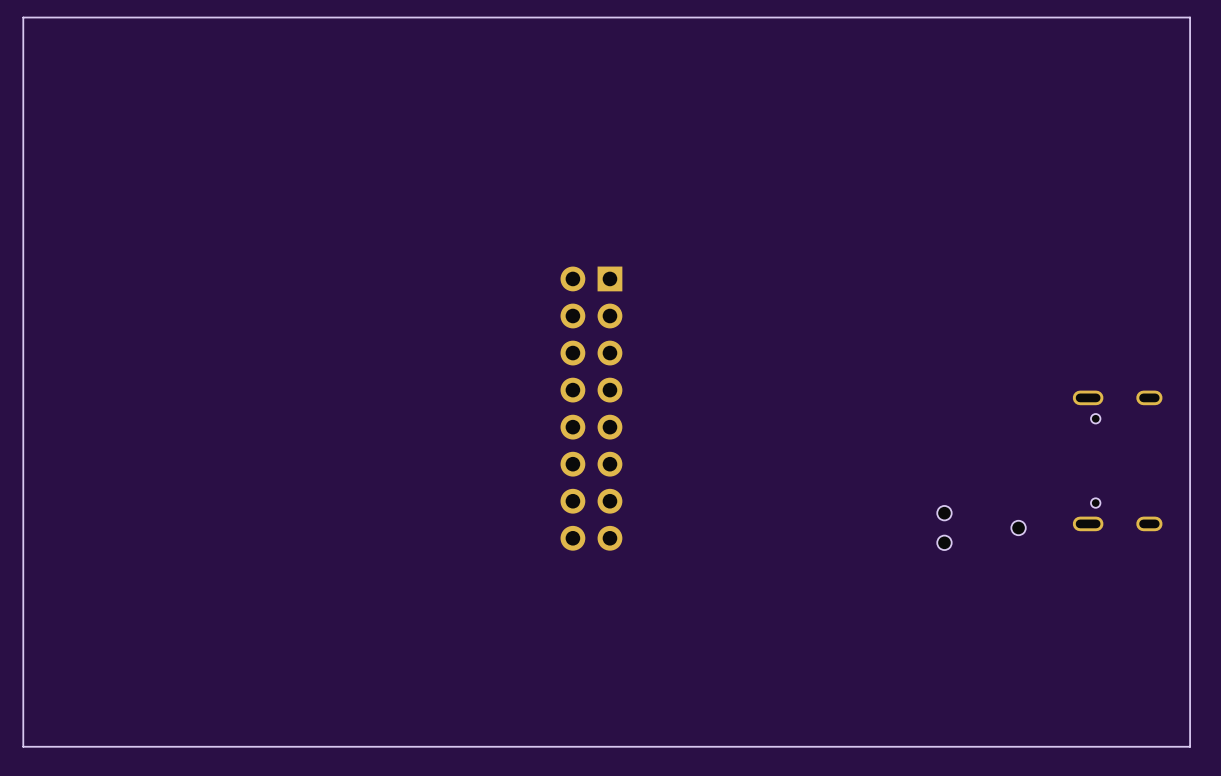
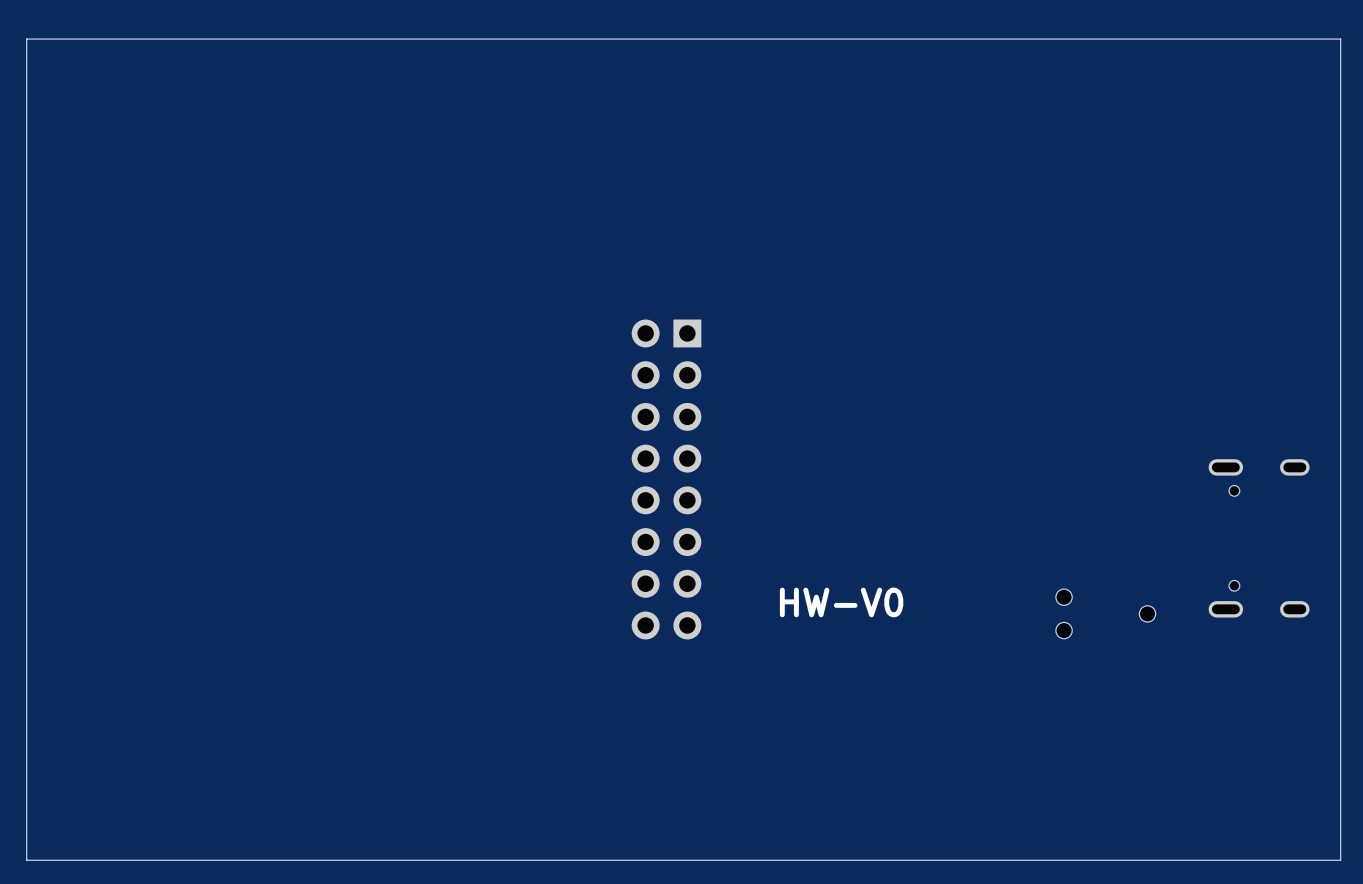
text: none -> HW-V0 (841, 602)

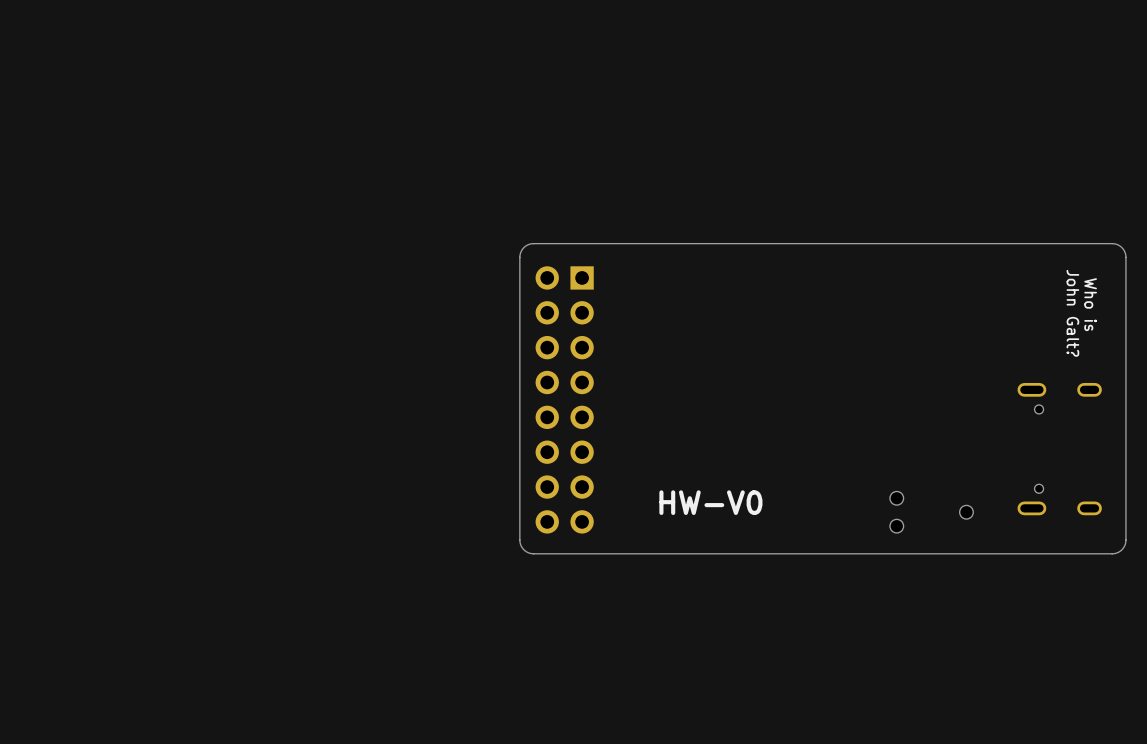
board edge: (1340, 39) (26, 39) (26, 860) (1340, 860) (1340, 39) -> none
board edge: none -> (1112, 243) (527, 244) (521, 250) (519, 257) (521, 546) (526, 551) (533, 553) (1118, 552) (1123, 547) (1125, 540) (1125, 257) (1121, 247) (1112, 243)
text: none -> Who is (1090, 304)
text: none -> John Galt? (1072, 313)

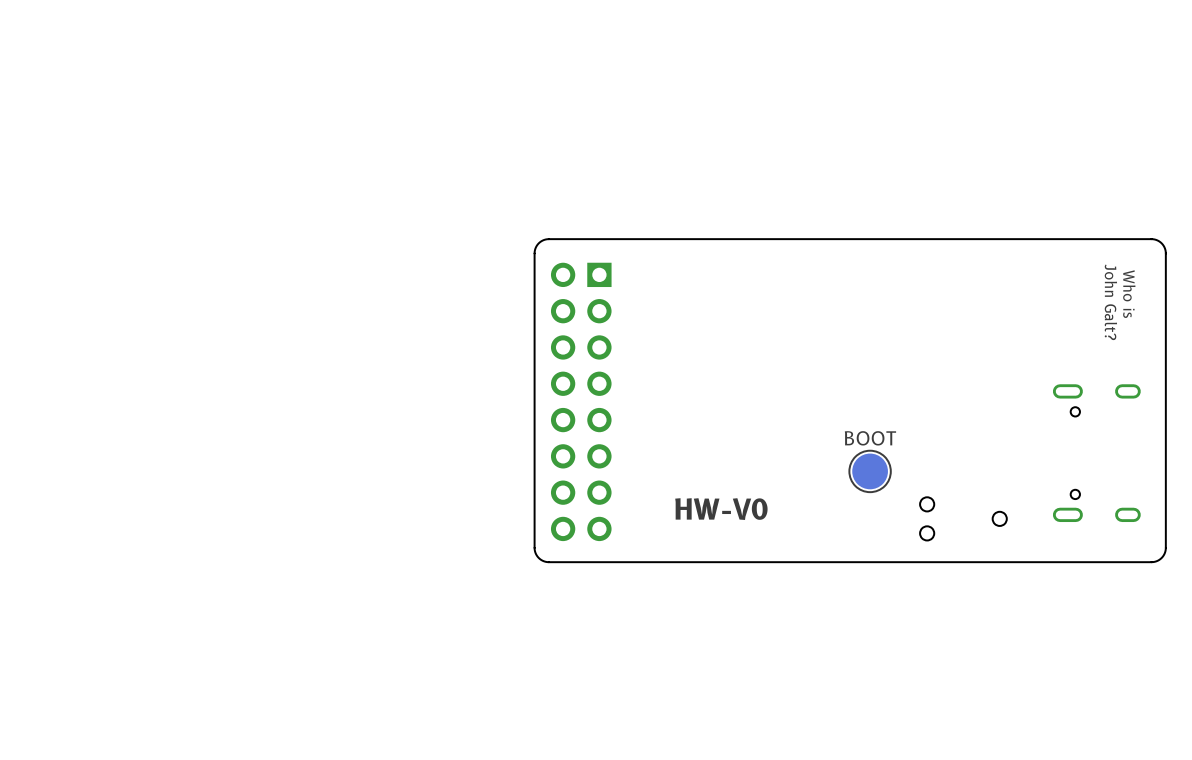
BOOT: none -> (870, 471)

